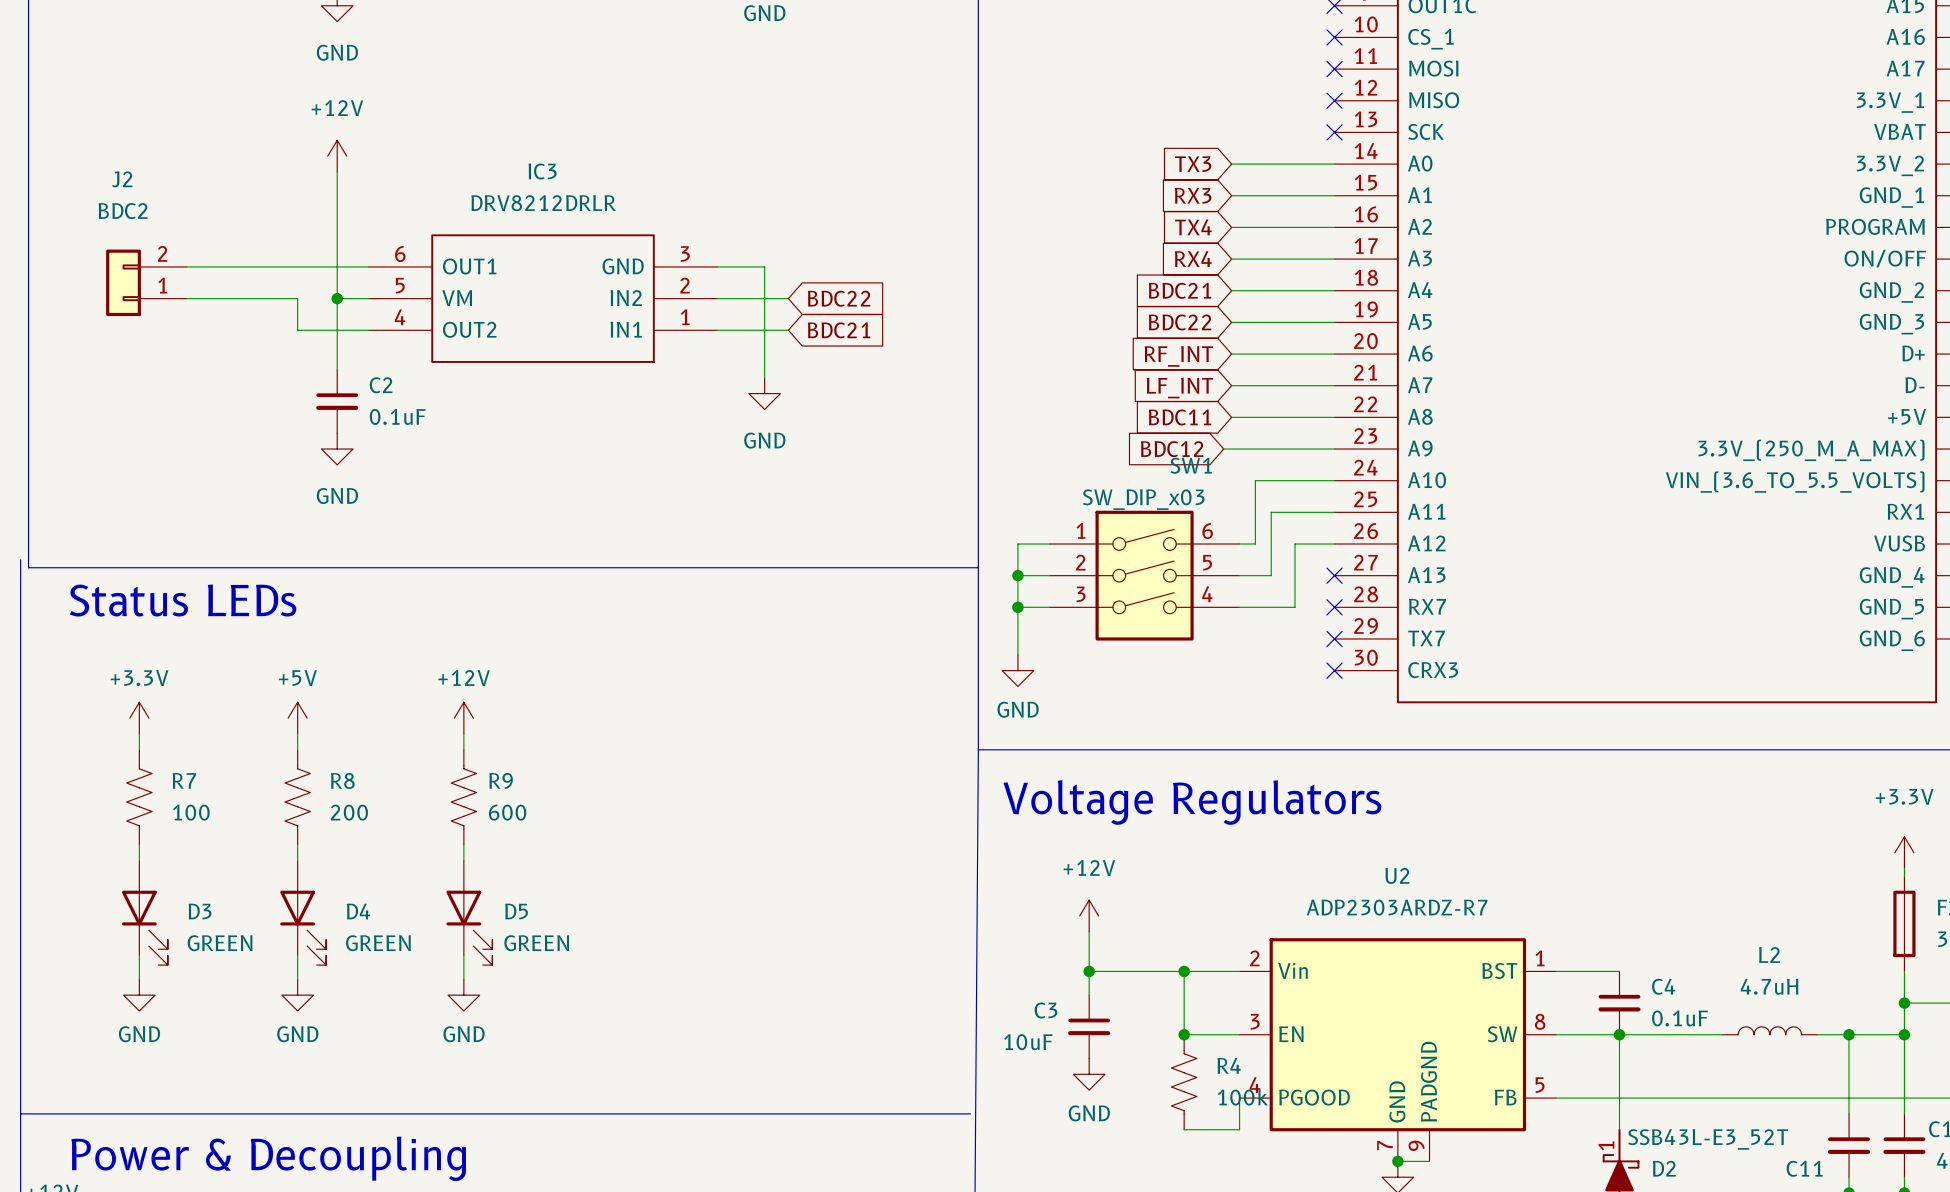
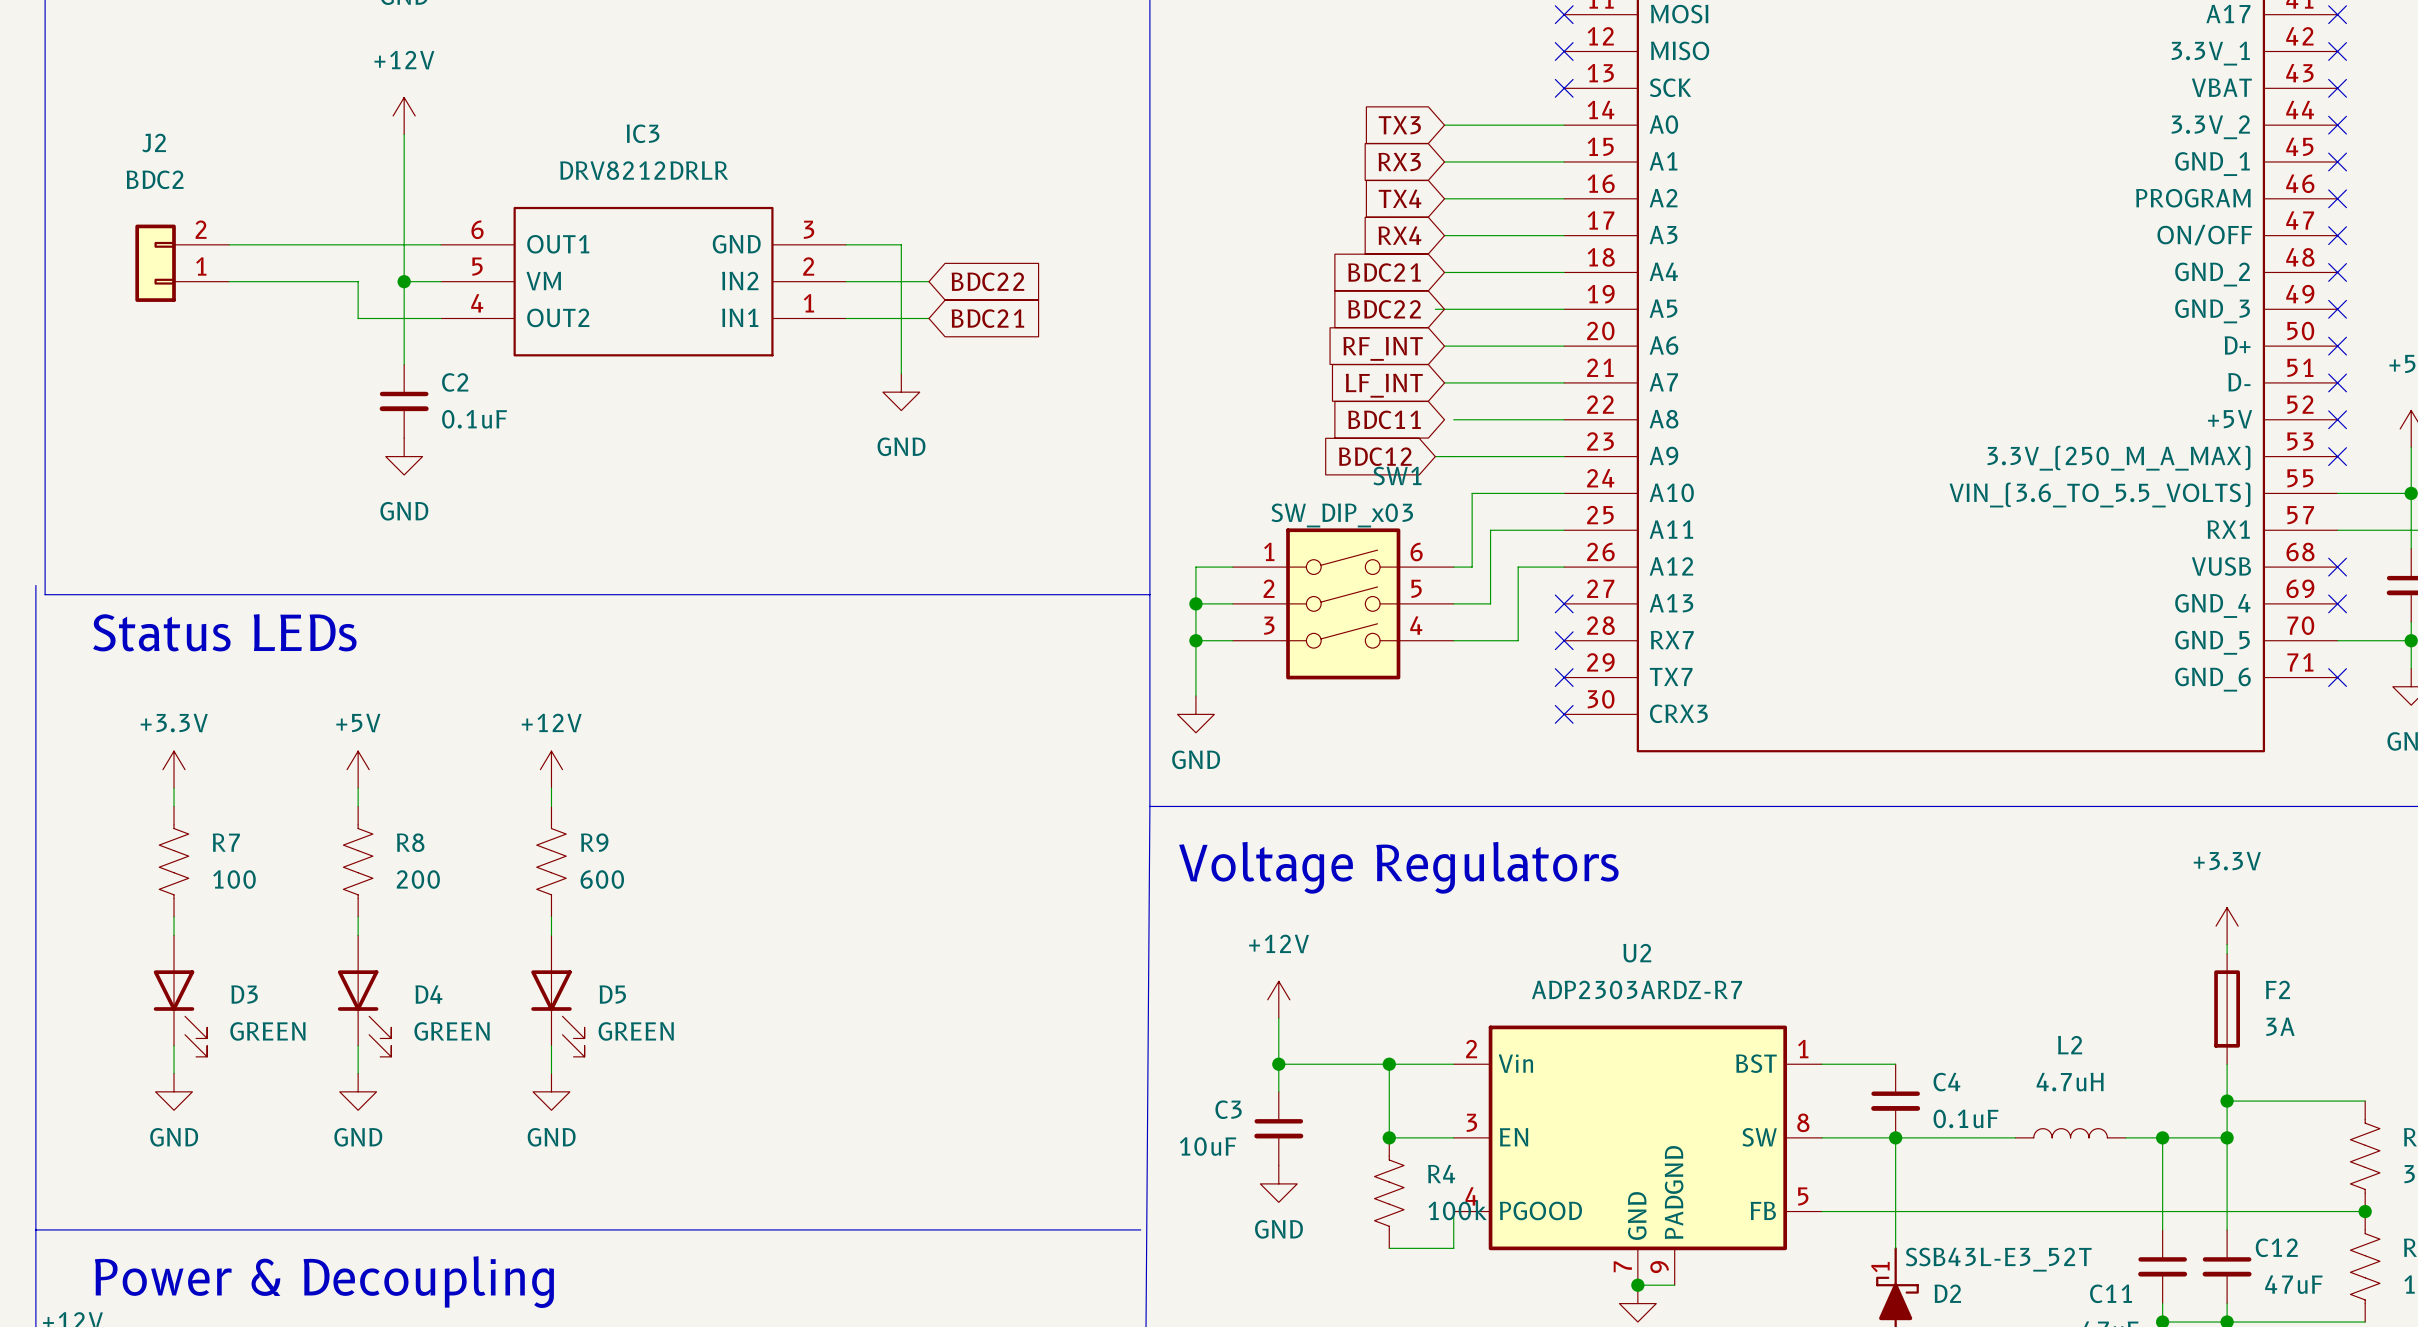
wire: (1231, 417) (1239, 417) -> (1435, 309) (1444, 309)

